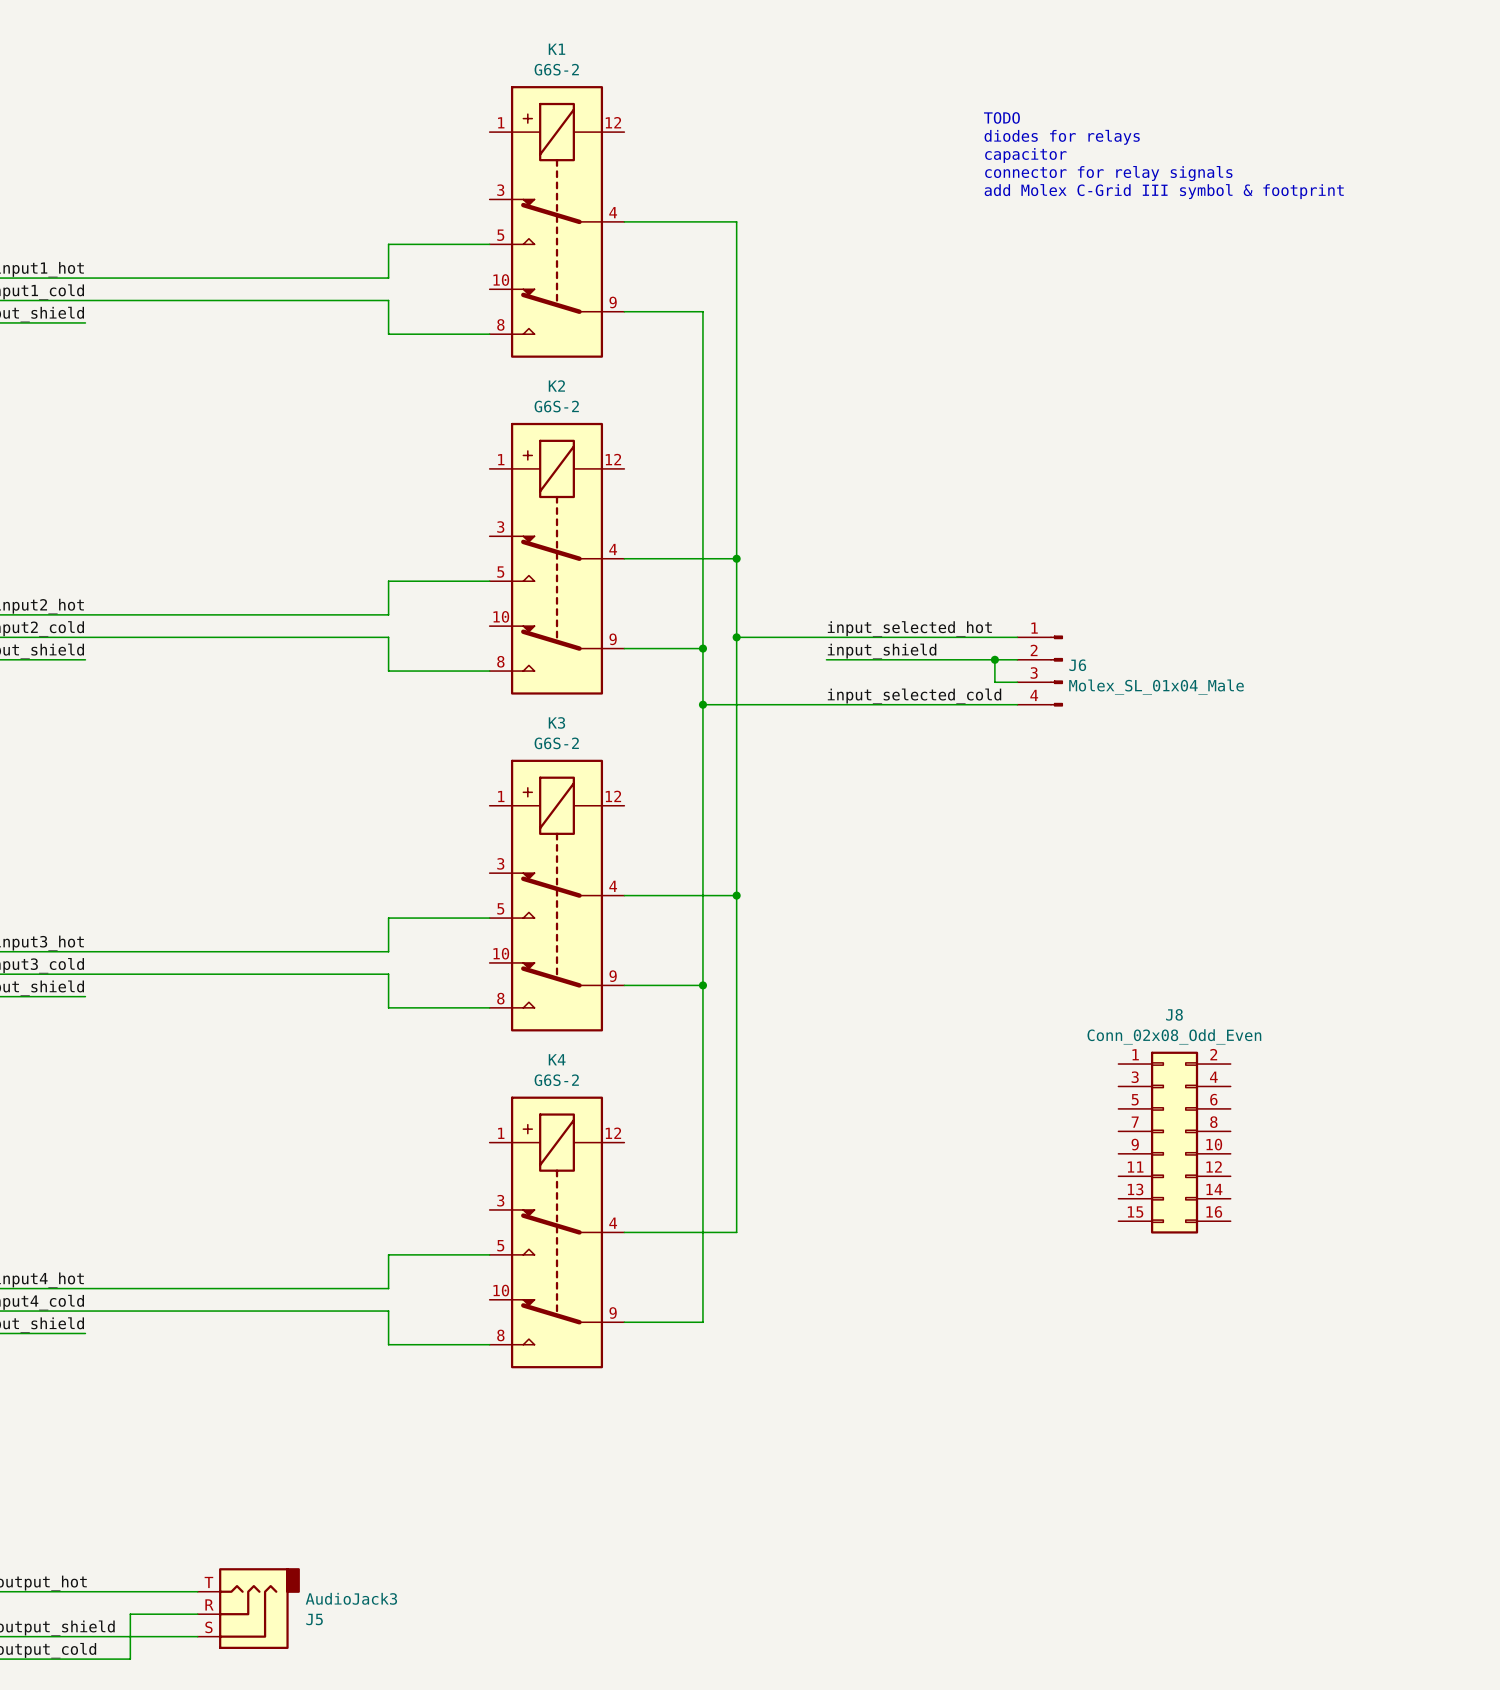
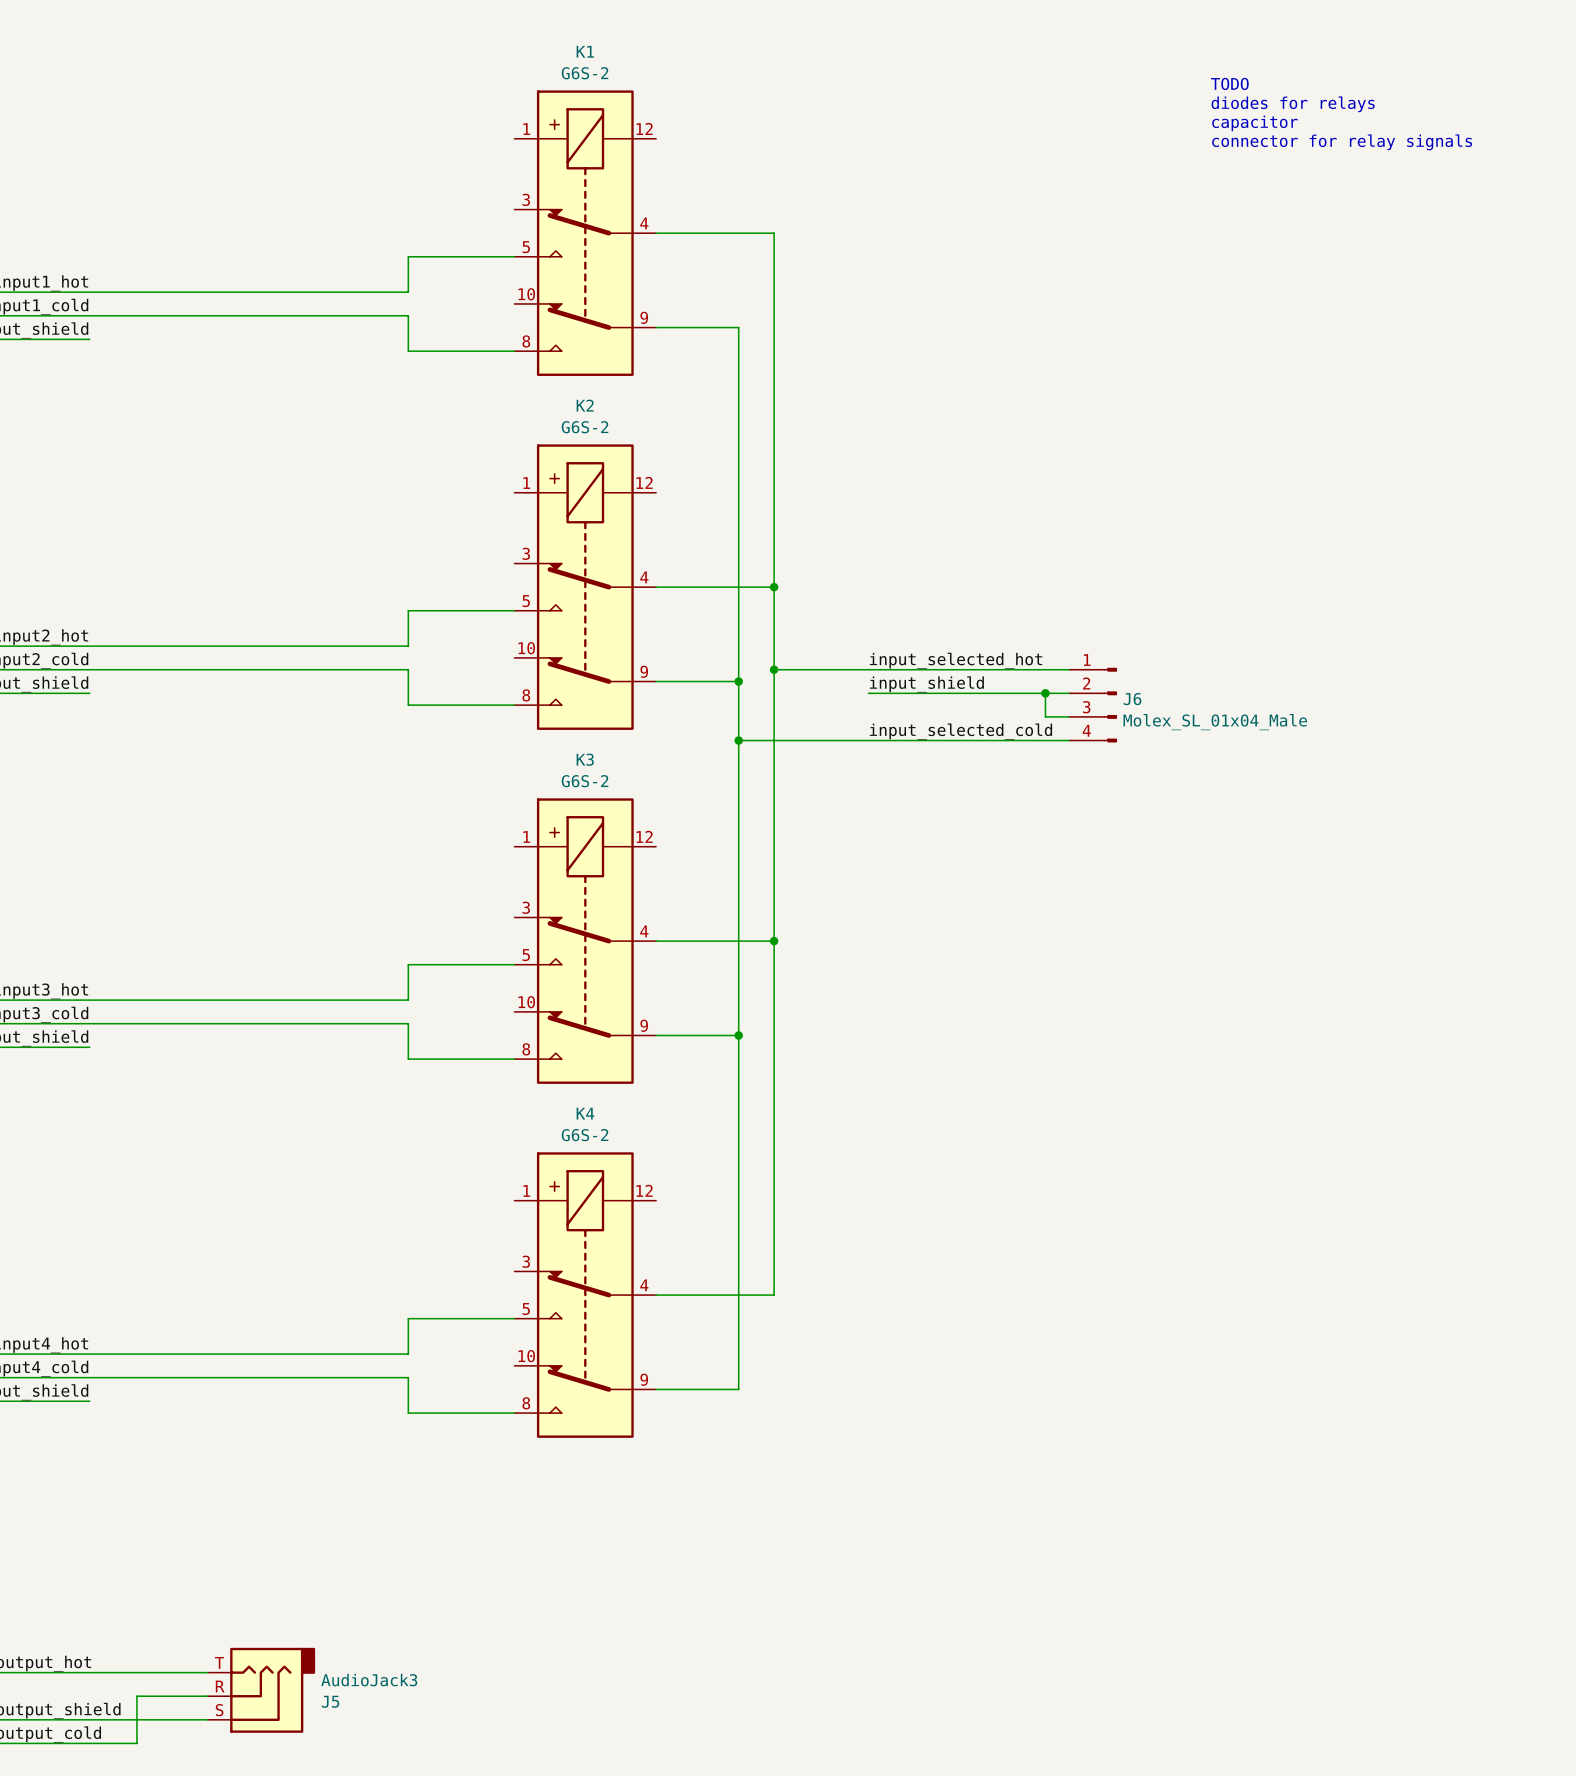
text position: TODO (1001, 117) -> TODO (1229, 83)
text position: diodes for relays (1062, 137) -> diodes for relays (1293, 104)
text position: capacitor (1025, 155) -> capacitor (1254, 123)
text position: connector for relay signals (1108, 173) -> connector for relay signals (1342, 142)
text: add Molex C-Grid III symbol & footprint (1164, 191) -> none
J8: Conn_02x08_Odd_Even (1174, 1142) -> none

